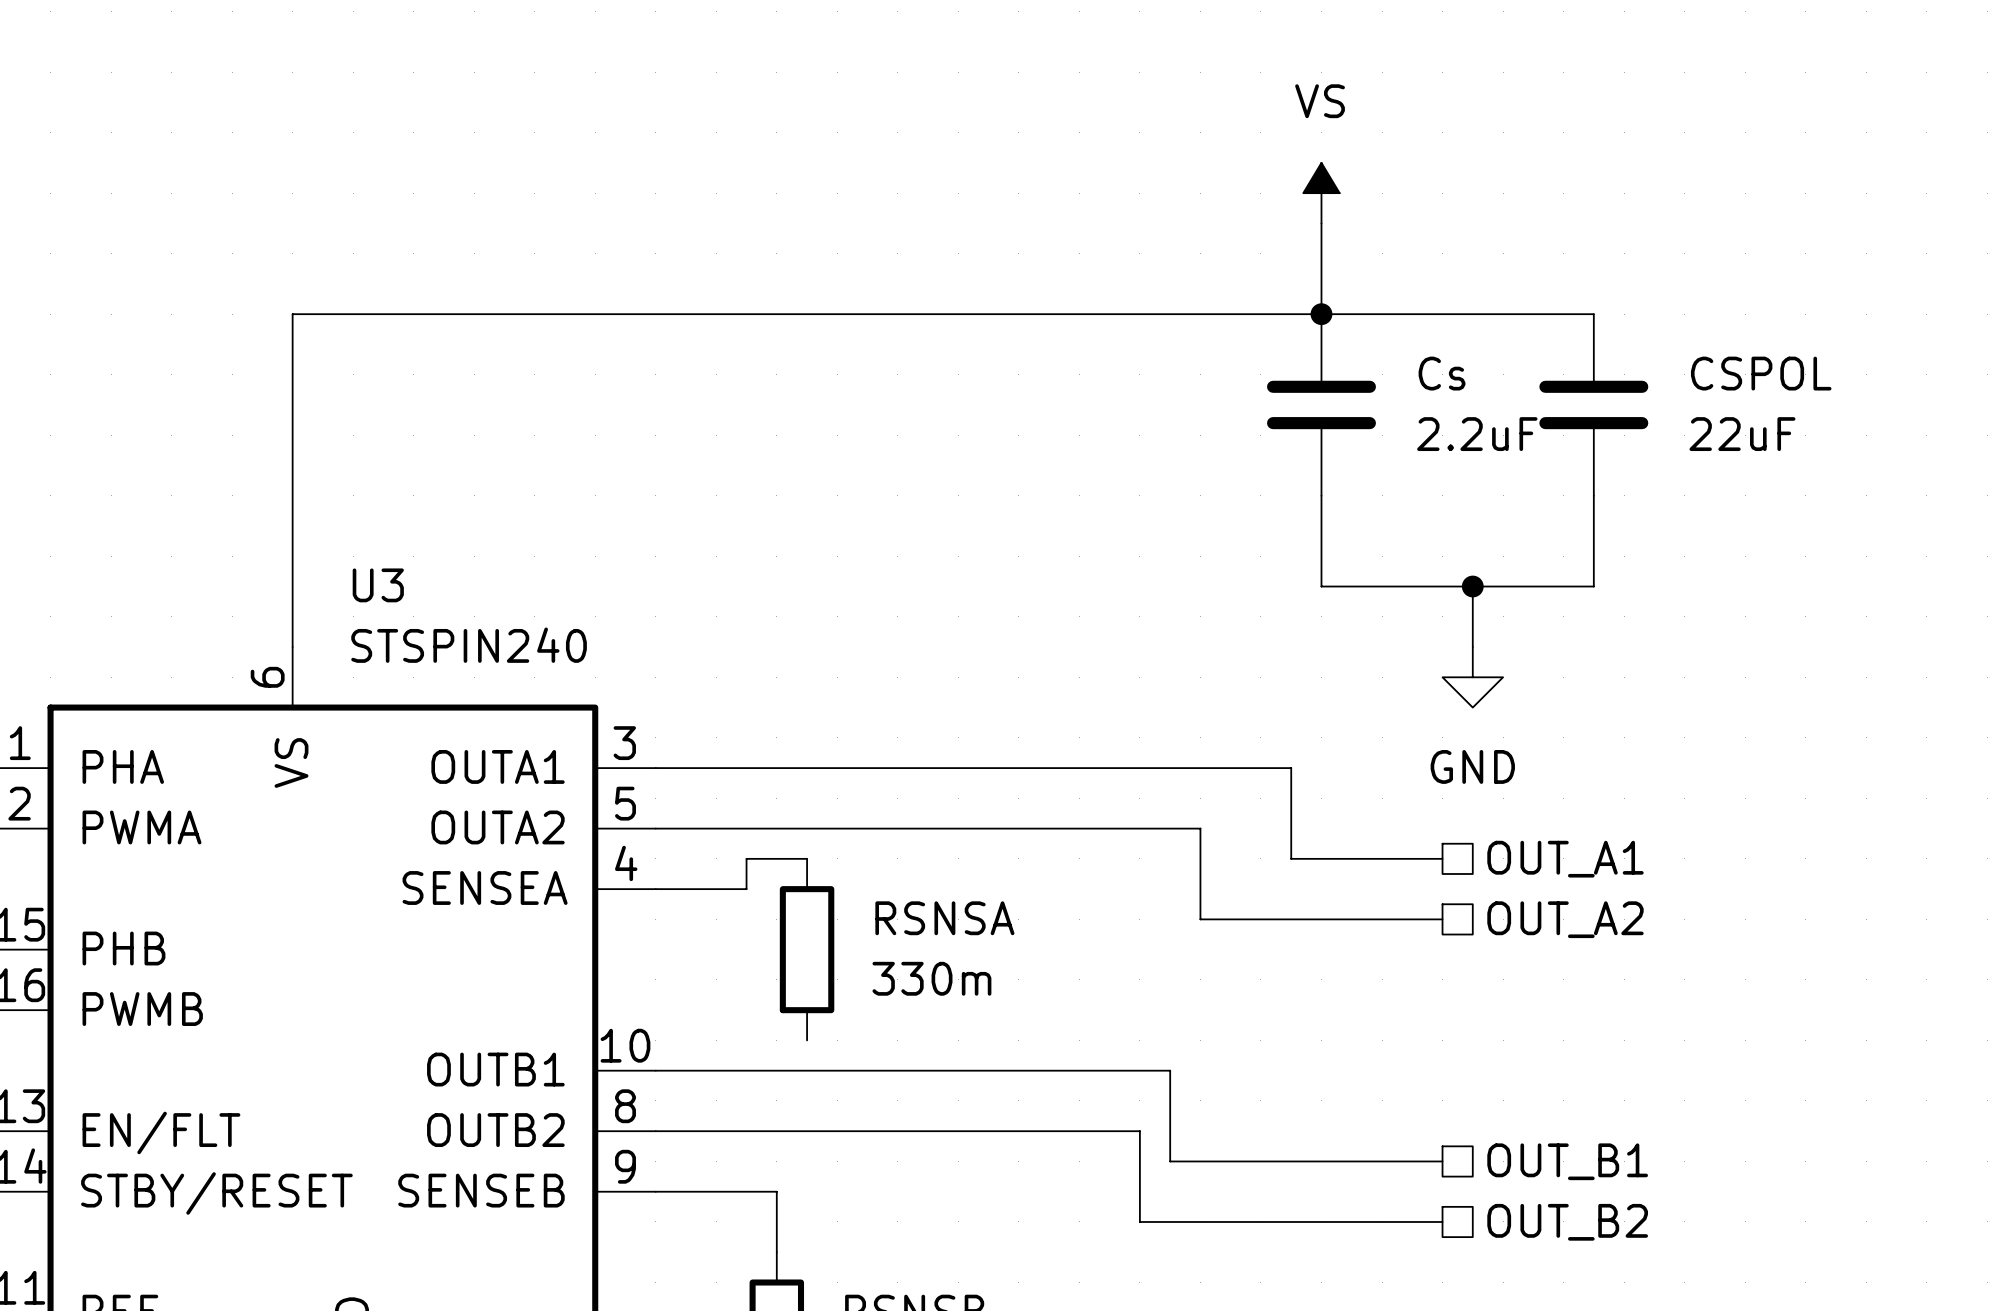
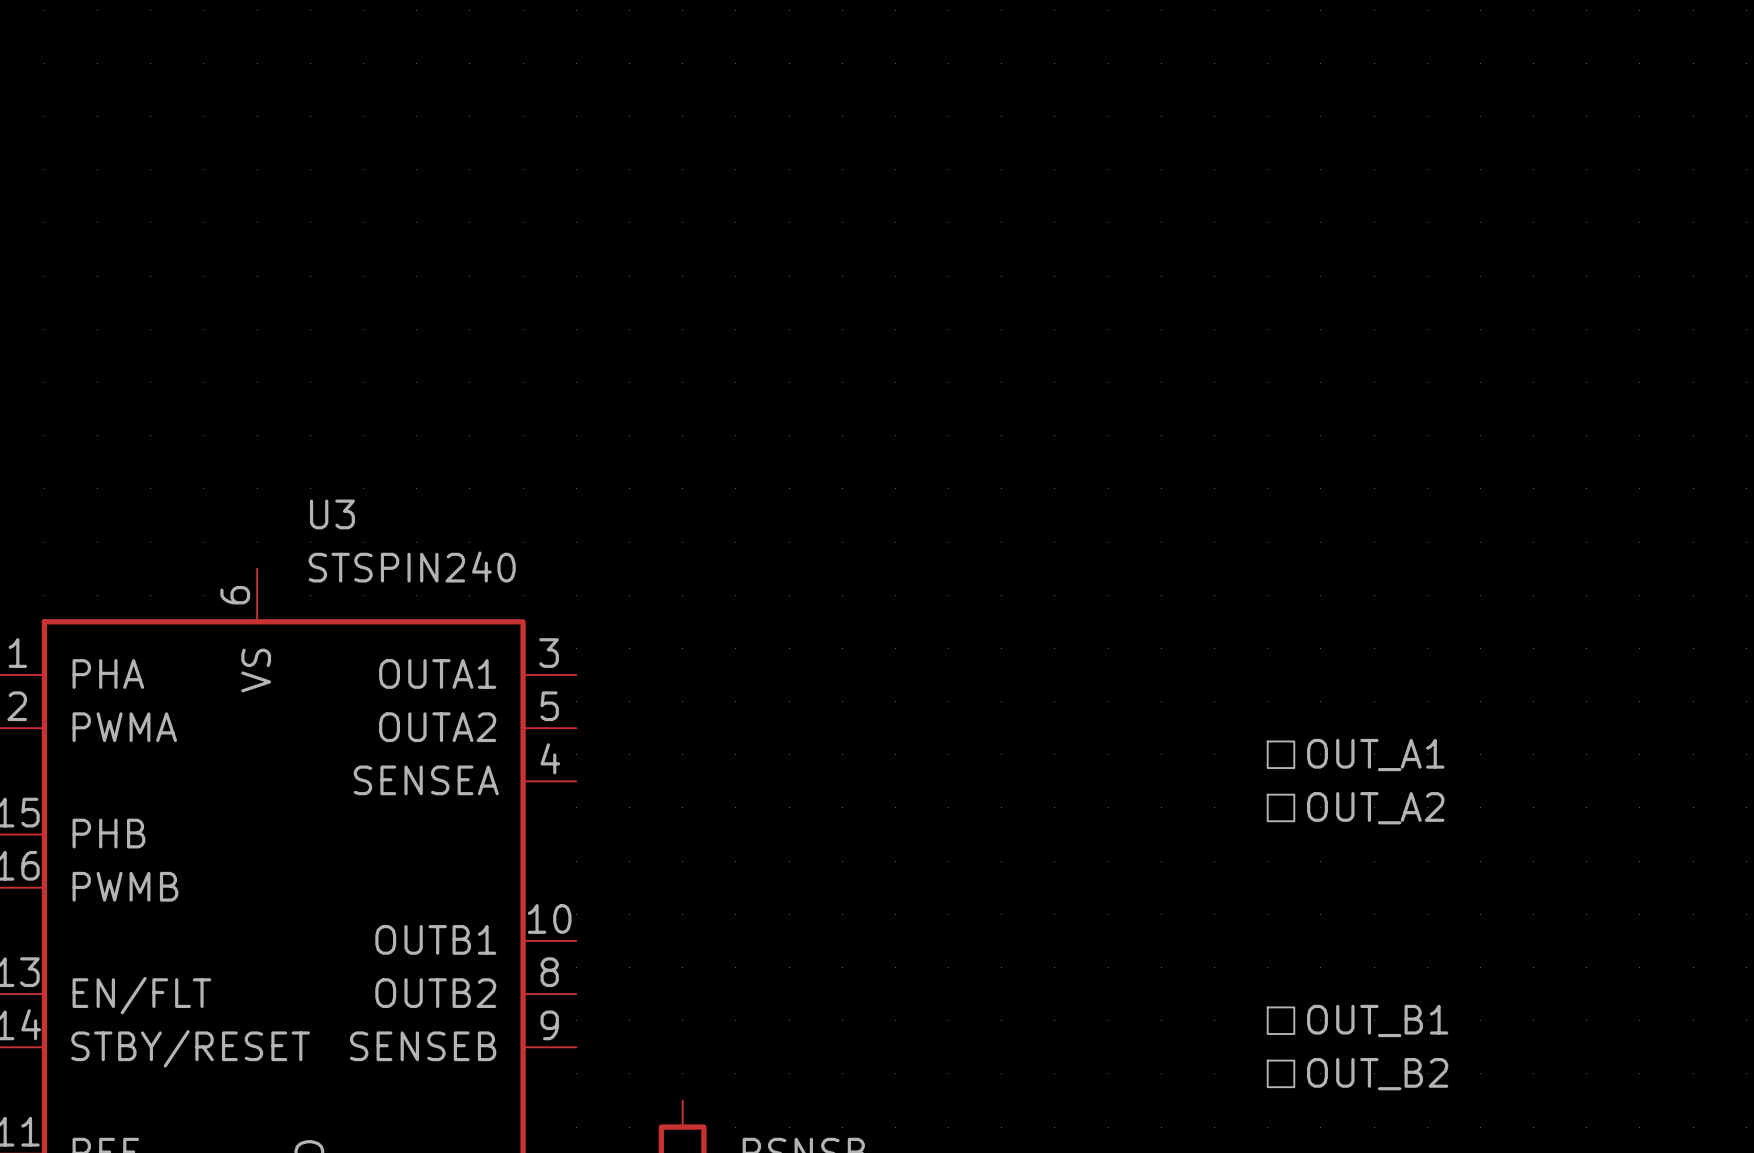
power symbol: VS (1321, 193) -> none
wire: (1321, 223) (1321, 314) -> none
junction: (1321, 314) -> none
wire: (1593, 314) (292, 314) (292, 647) -> none
Cs: 2.2uF (1321, 404) -> none
CSPOL: 22uF (1593, 404) -> none
wire: (1321, 495) (1321, 586) (1593, 586) (1593, 495) -> none
wire: (1472, 586) (1472, 647) -> none
junction: (1472, 586) -> none
power symbol: GND (1472, 677) -> none
wire: (655, 768) (1291, 768) (1291, 858) (1442, 858) -> none
wire: (655, 828) (1200, 828) (1200, 919) (1442, 919) -> none
wire: (807, 858) (746, 858) (746, 889) (655, 889) -> none
RSNSA: 330m (807, 949) -> none
wire: (655, 1070) (1170, 1070) (1170, 1161) (1442, 1161) -> none
wire: (655, 1131) (1139, 1131) (1139, 1221) (1442, 1221) -> none
wire: (655, 1191) (776, 1191) (776, 1252) -> none

